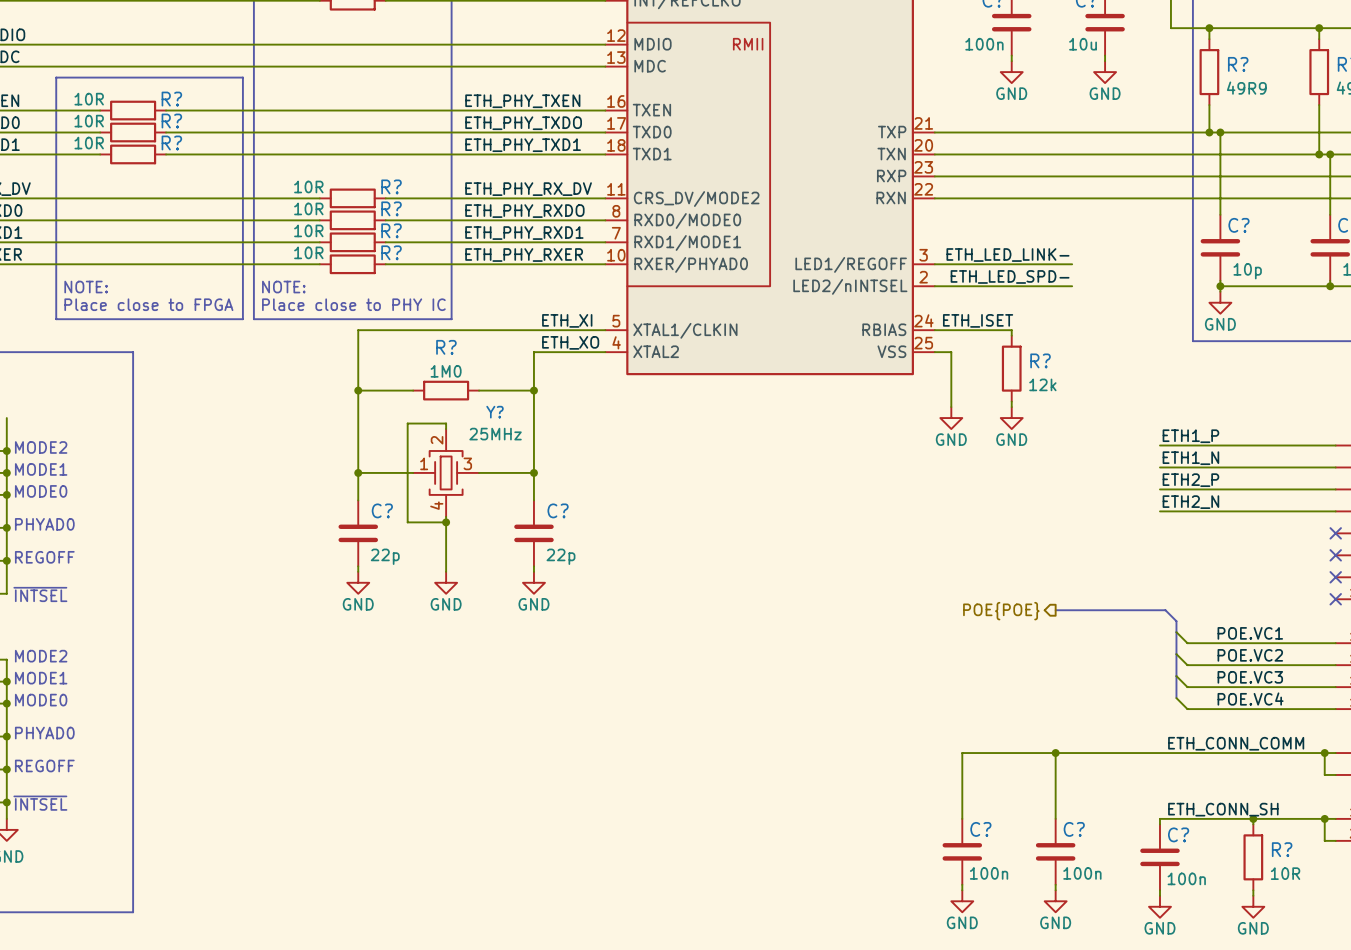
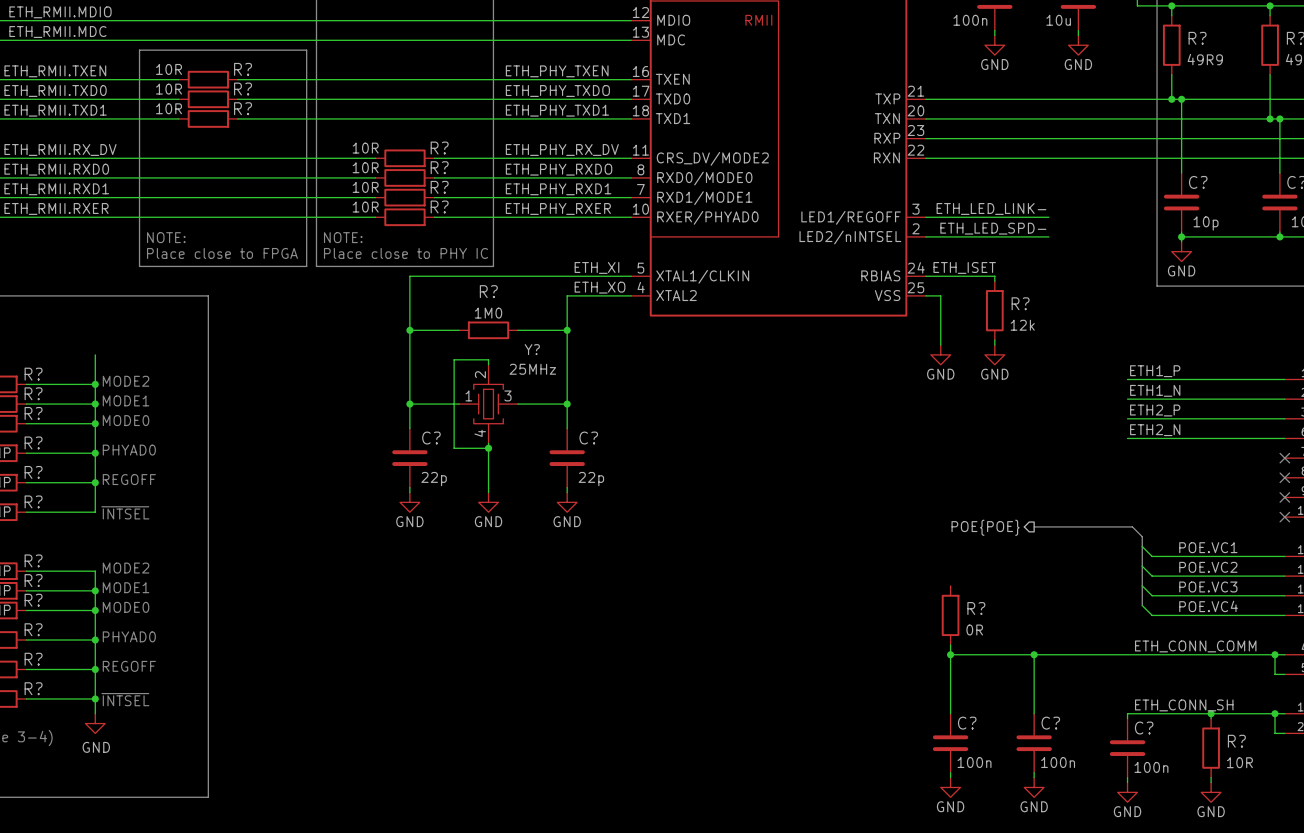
R?: none -> (950, 615)
wire: none -> (950, 644) (950, 654)
junction: none -> (950, 654)

